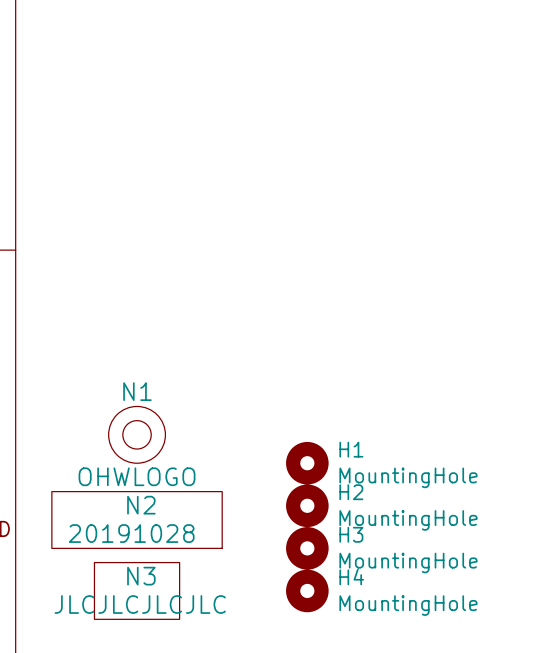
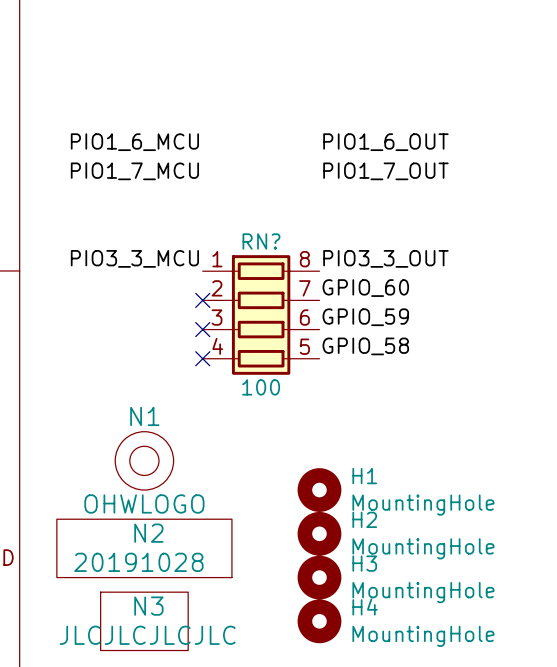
label: none -> PIO1_6_MCU (134, 142)
label: none -> PIO1_6_OUT (385, 142)
label: none -> PIO1_7_MCU (134, 171)
label: none -> PIO1_7_OUT (385, 171)
label: none -> PIO3_3_MCU (134, 258)
label: none -> PIO3_3_OUT (385, 258)
label: none -> GPIO_60 (365, 288)
no-connect mark: none -> (202, 300)
RN?: none -> 100 (261, 314)
label: none -> GPIO_59 (365, 317)
no-connect mark: none -> (202, 329)
label: none -> GPIO_58 (365, 346)
no-connect mark: none -> (202, 358)

